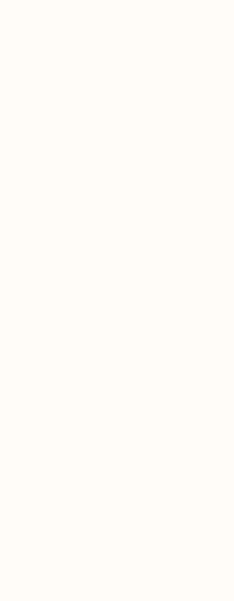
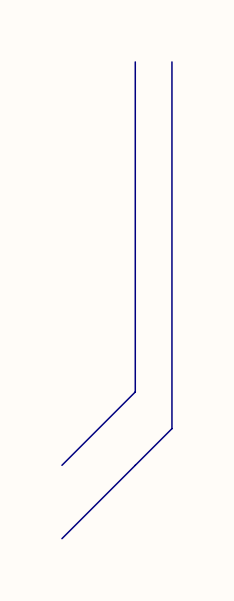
wire: none -> (135, 61) (135, 391) (61, 465)
wire: none -> (171, 61) (171, 428) (61, 538)

